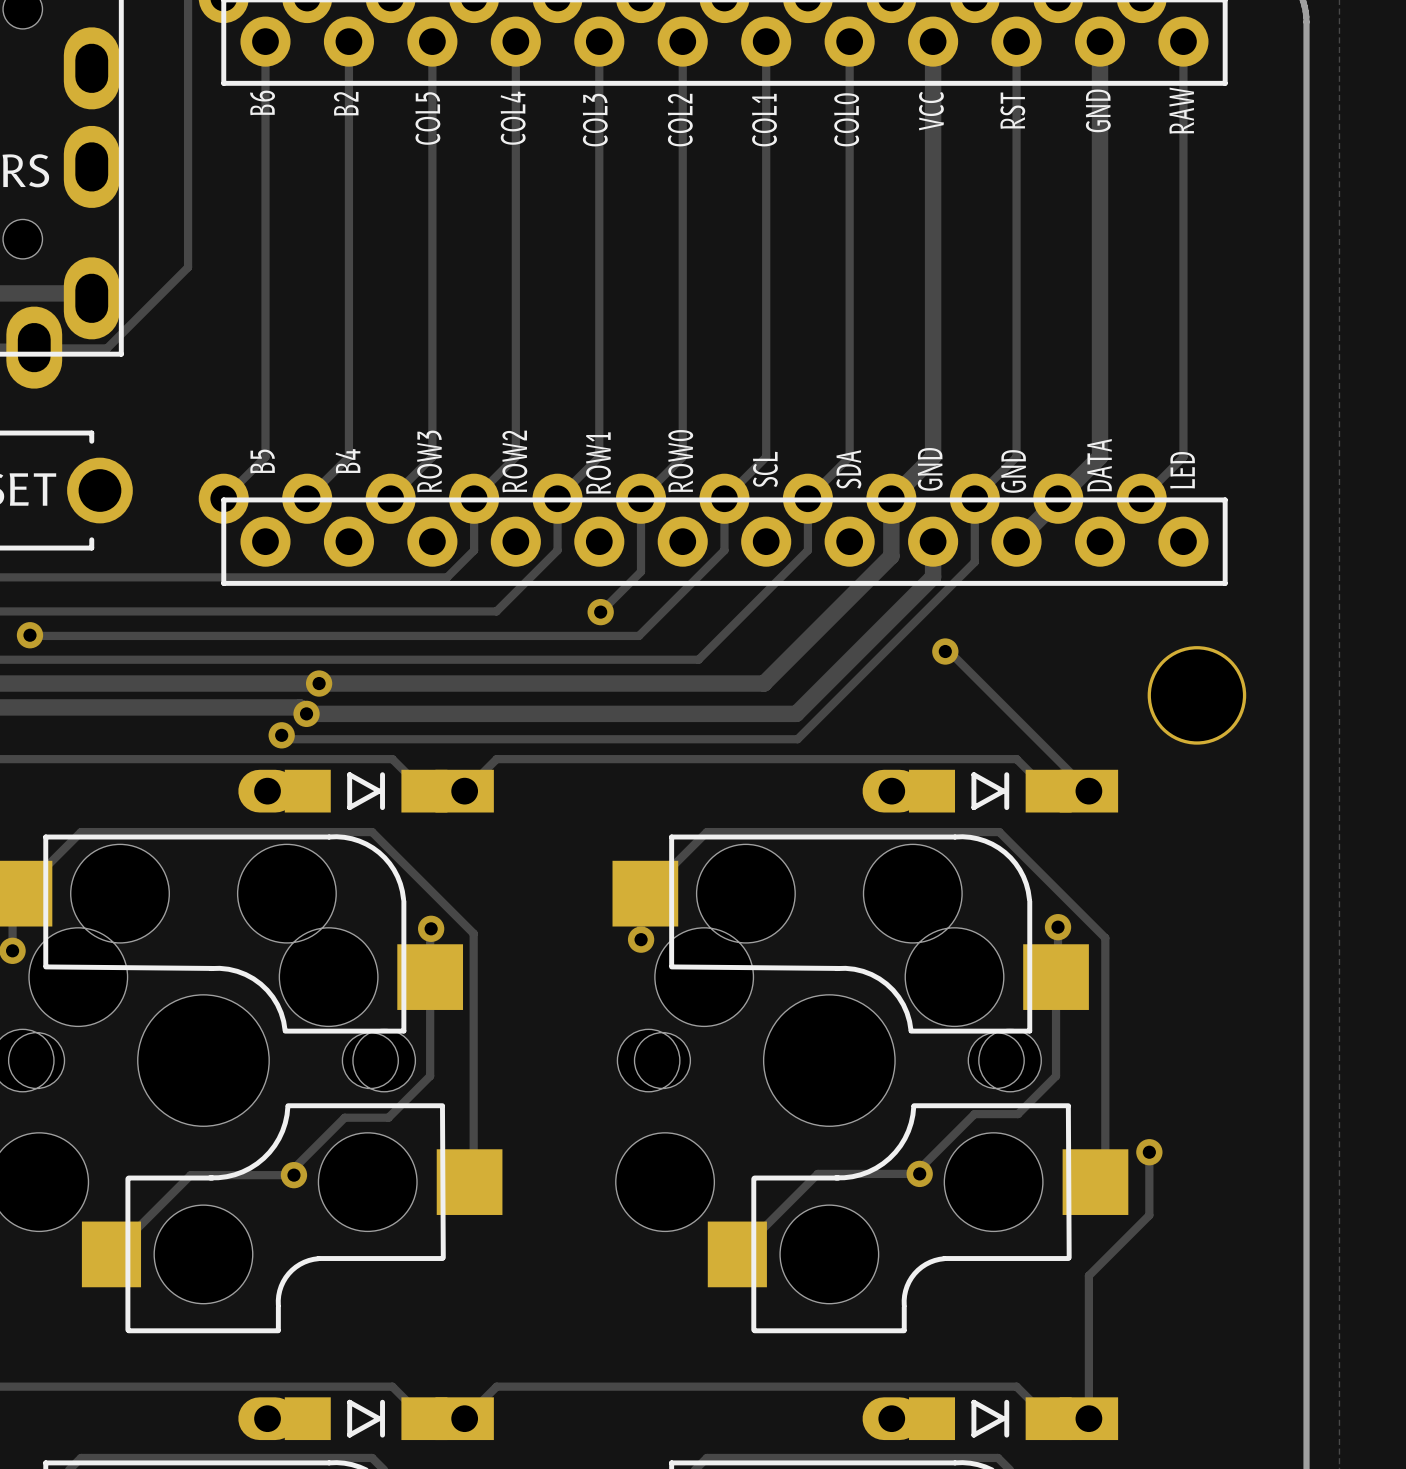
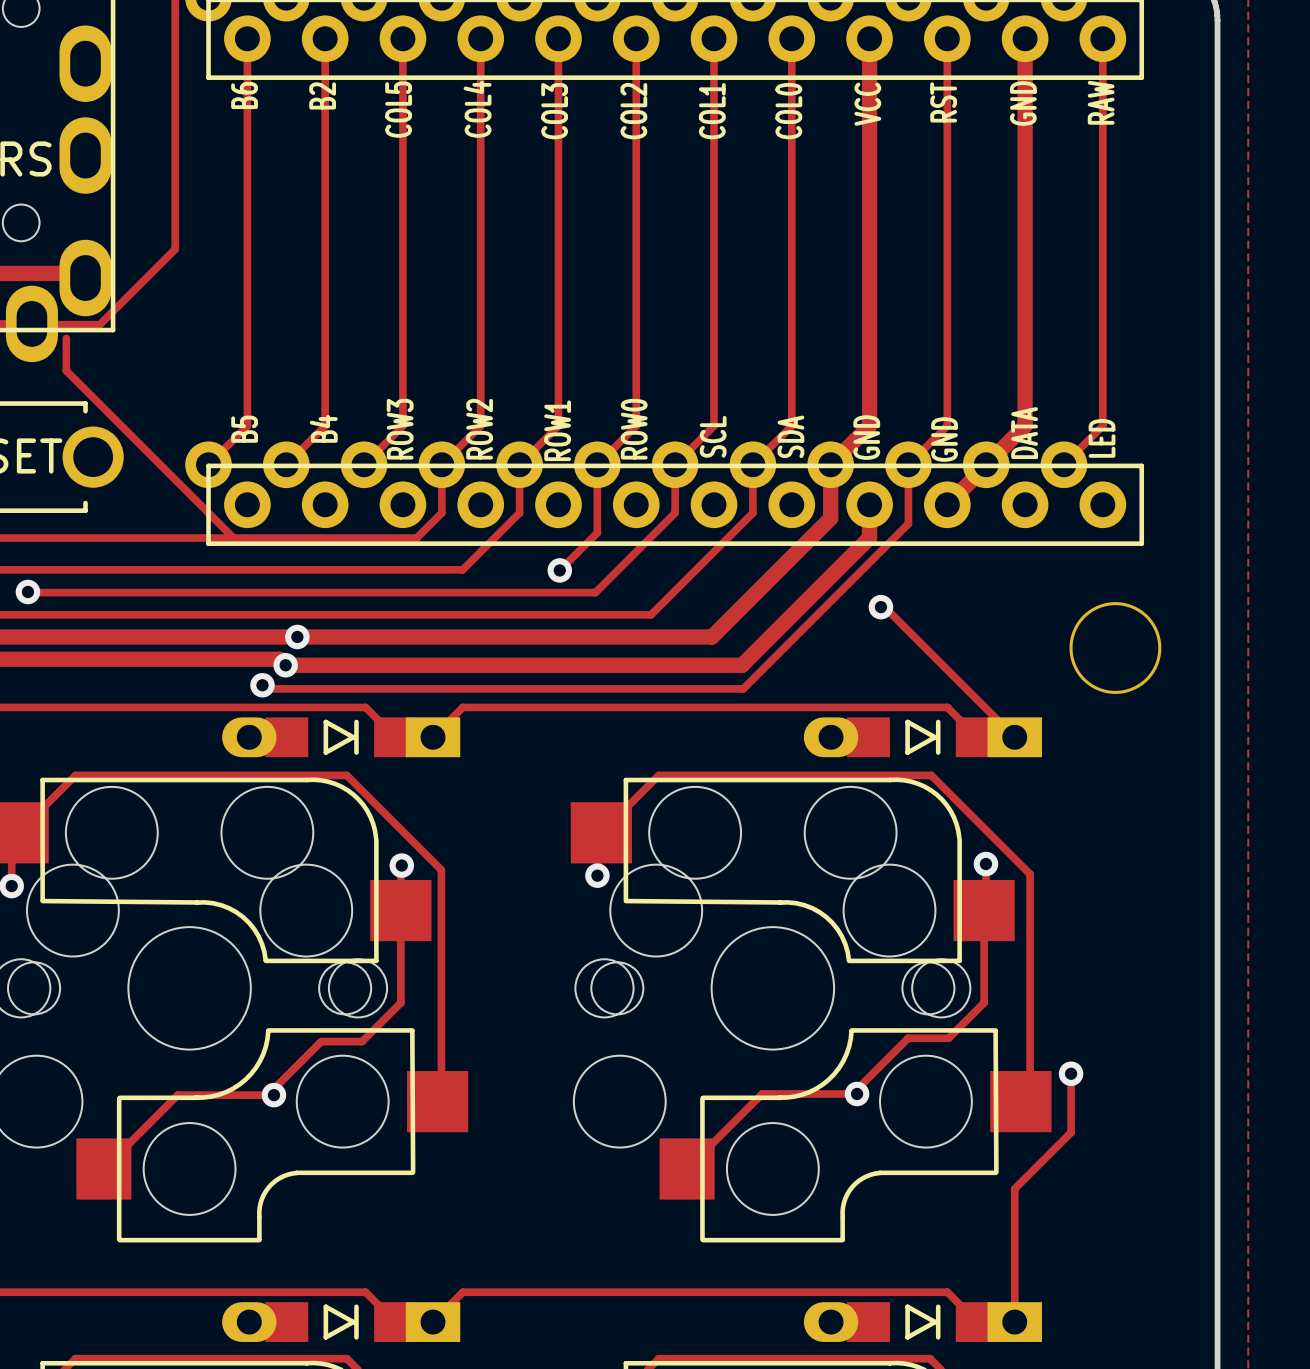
track: none -> (66, 338) (66, 370) (233, 538)

